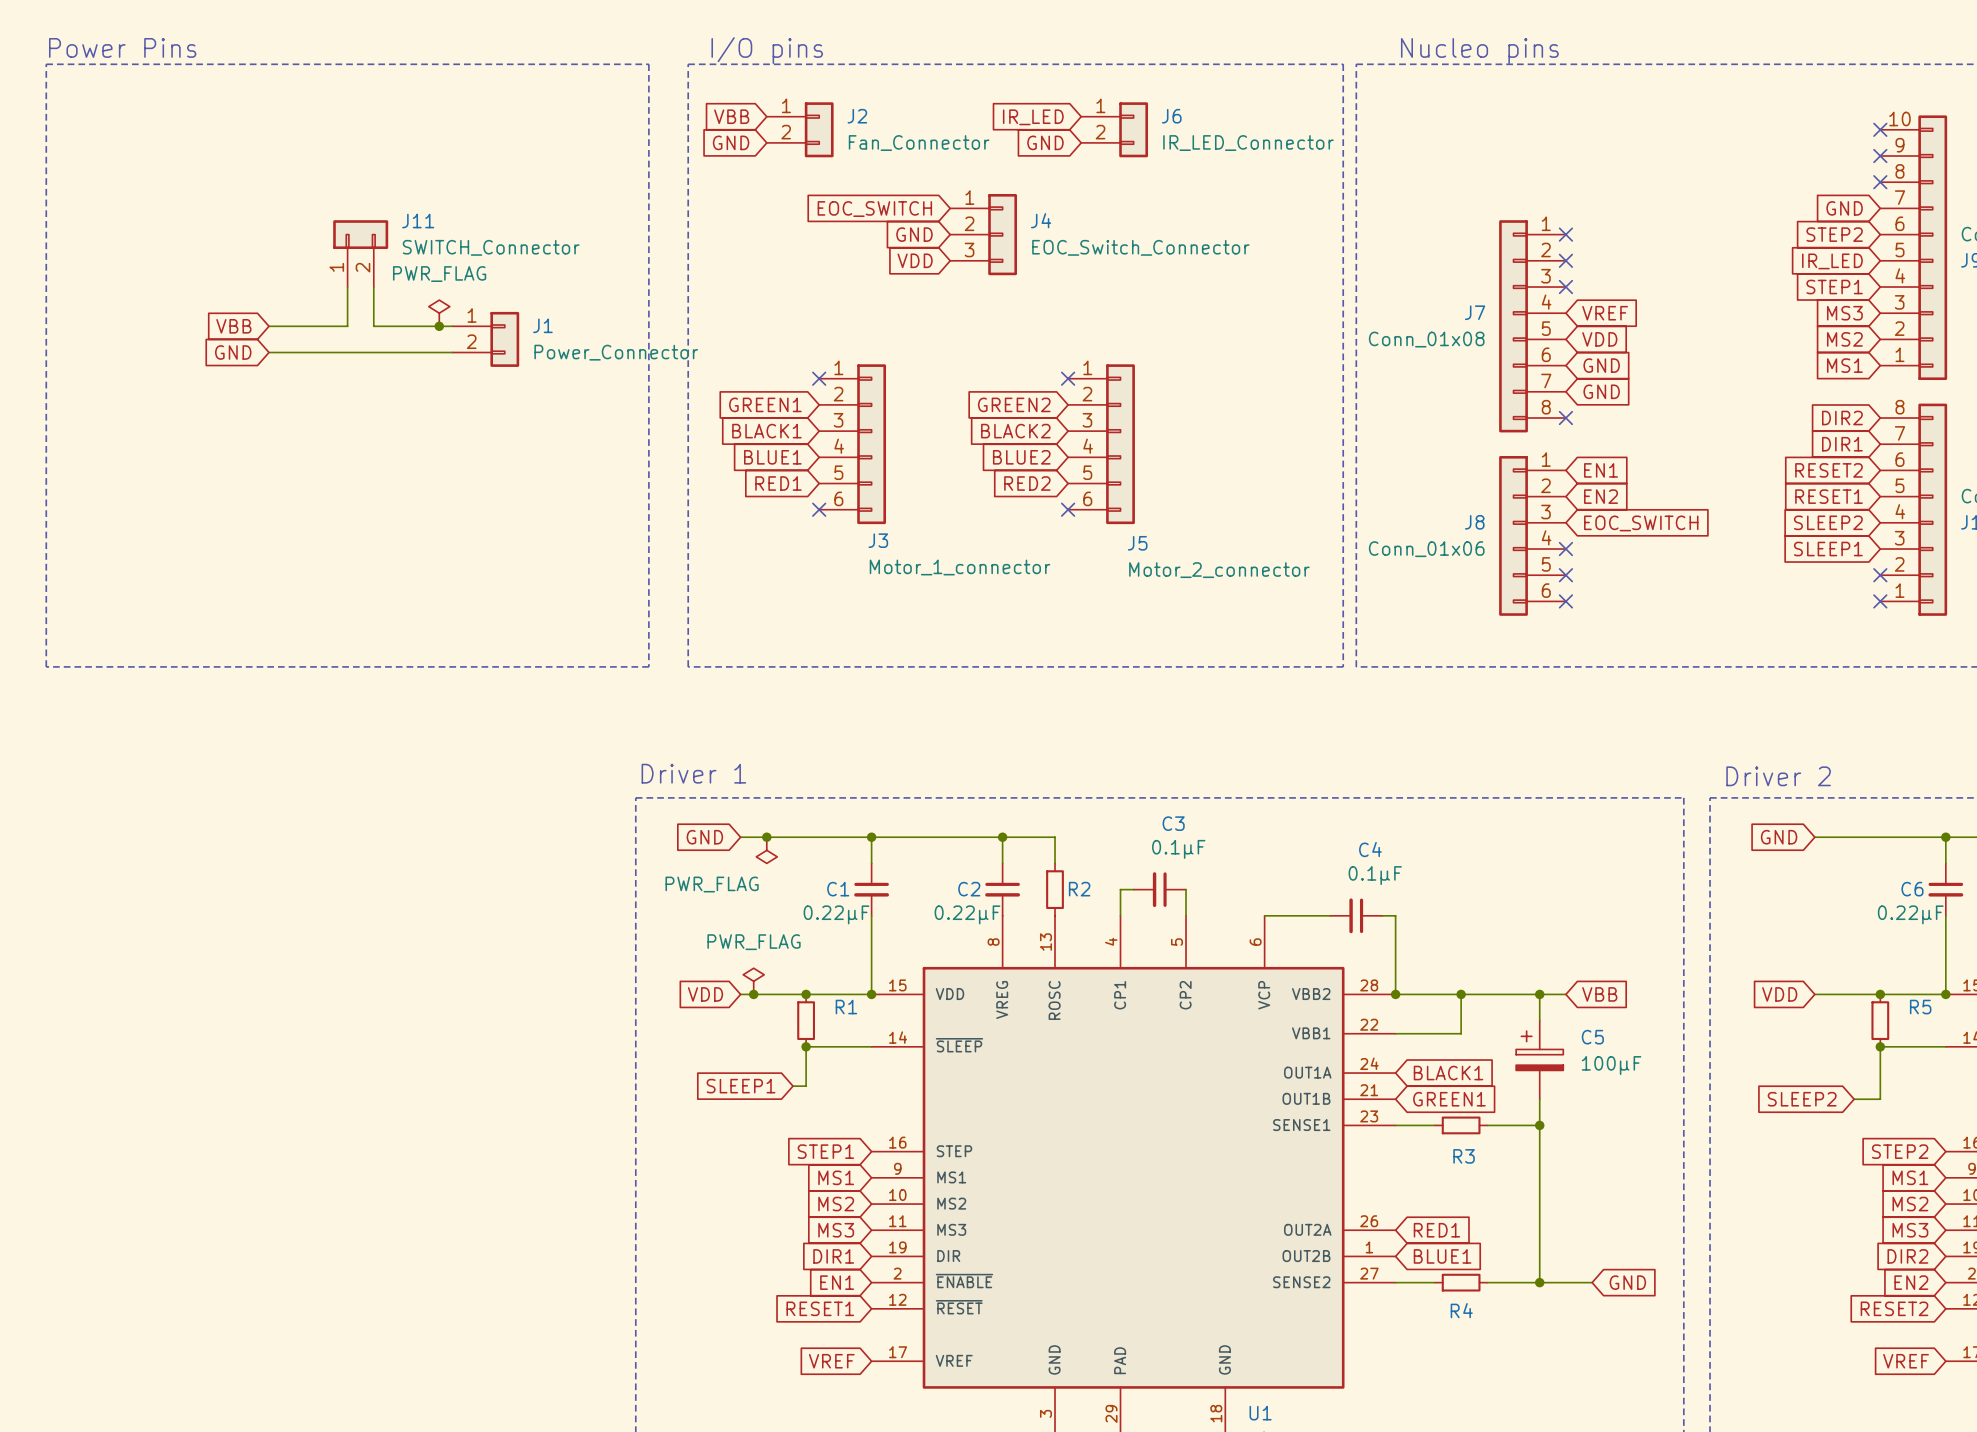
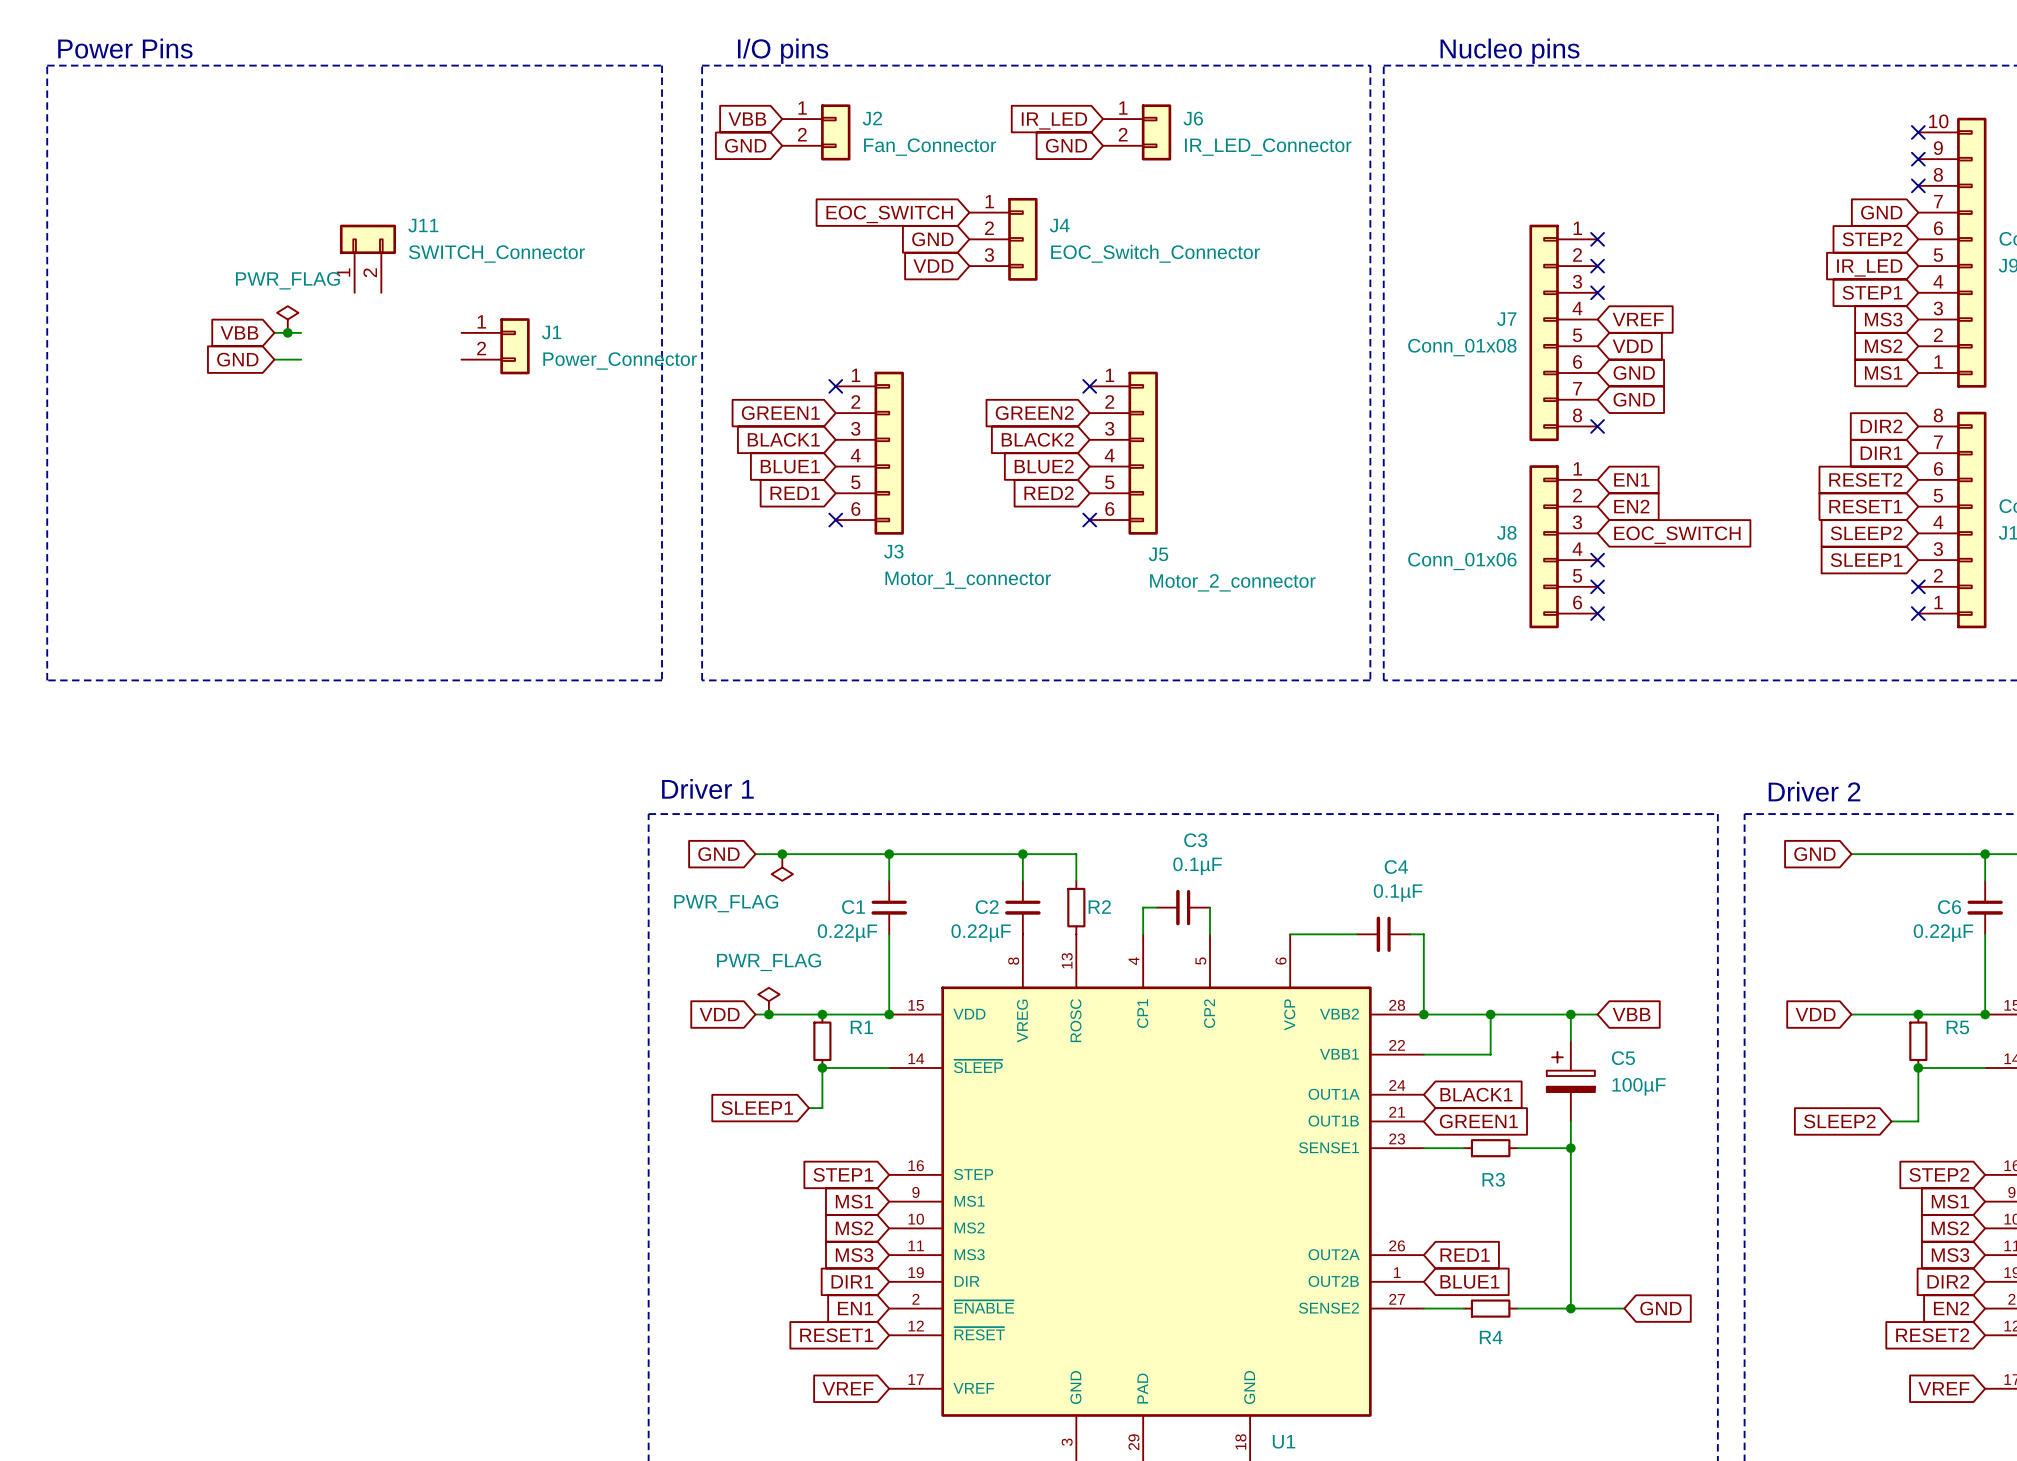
wire: (347, 287) (347, 326) (295, 326) -> none
wire: (373, 287) (373, 326) (452, 326) -> none
power symbol position: PWR_FLAG (439, 313) -> PWR_FLAG (287, 319)
junction: none -> (287, 332)
junction: (439, 326) -> none
wire: (295, 352) (452, 352) -> none

